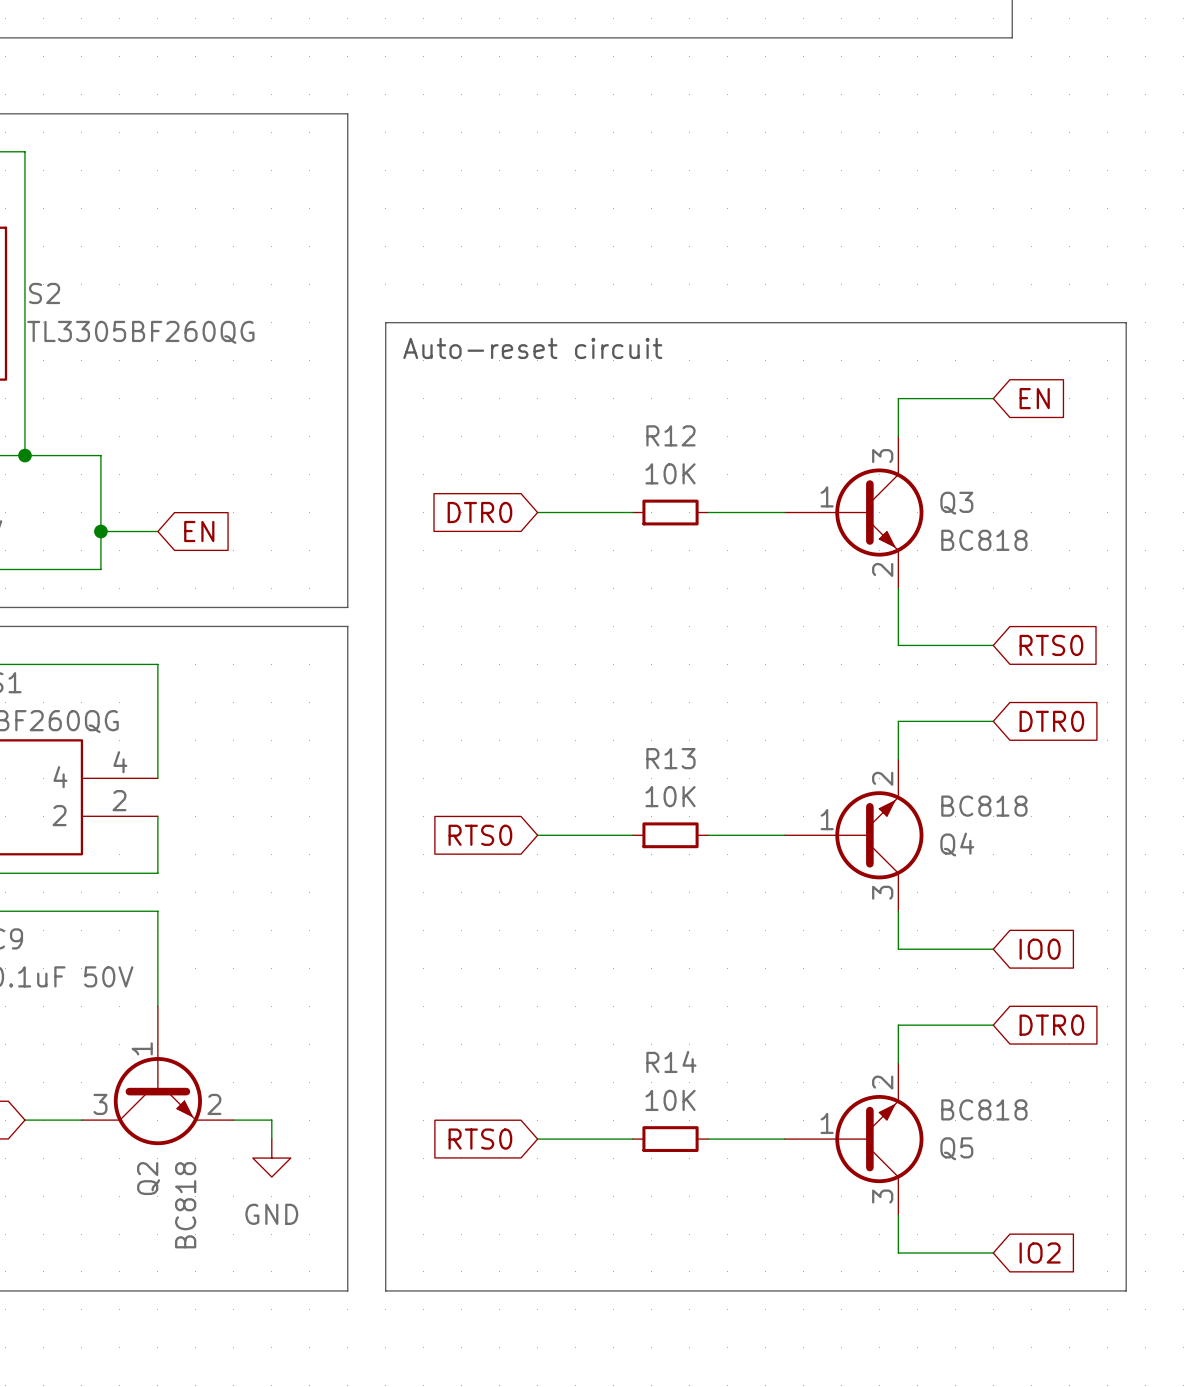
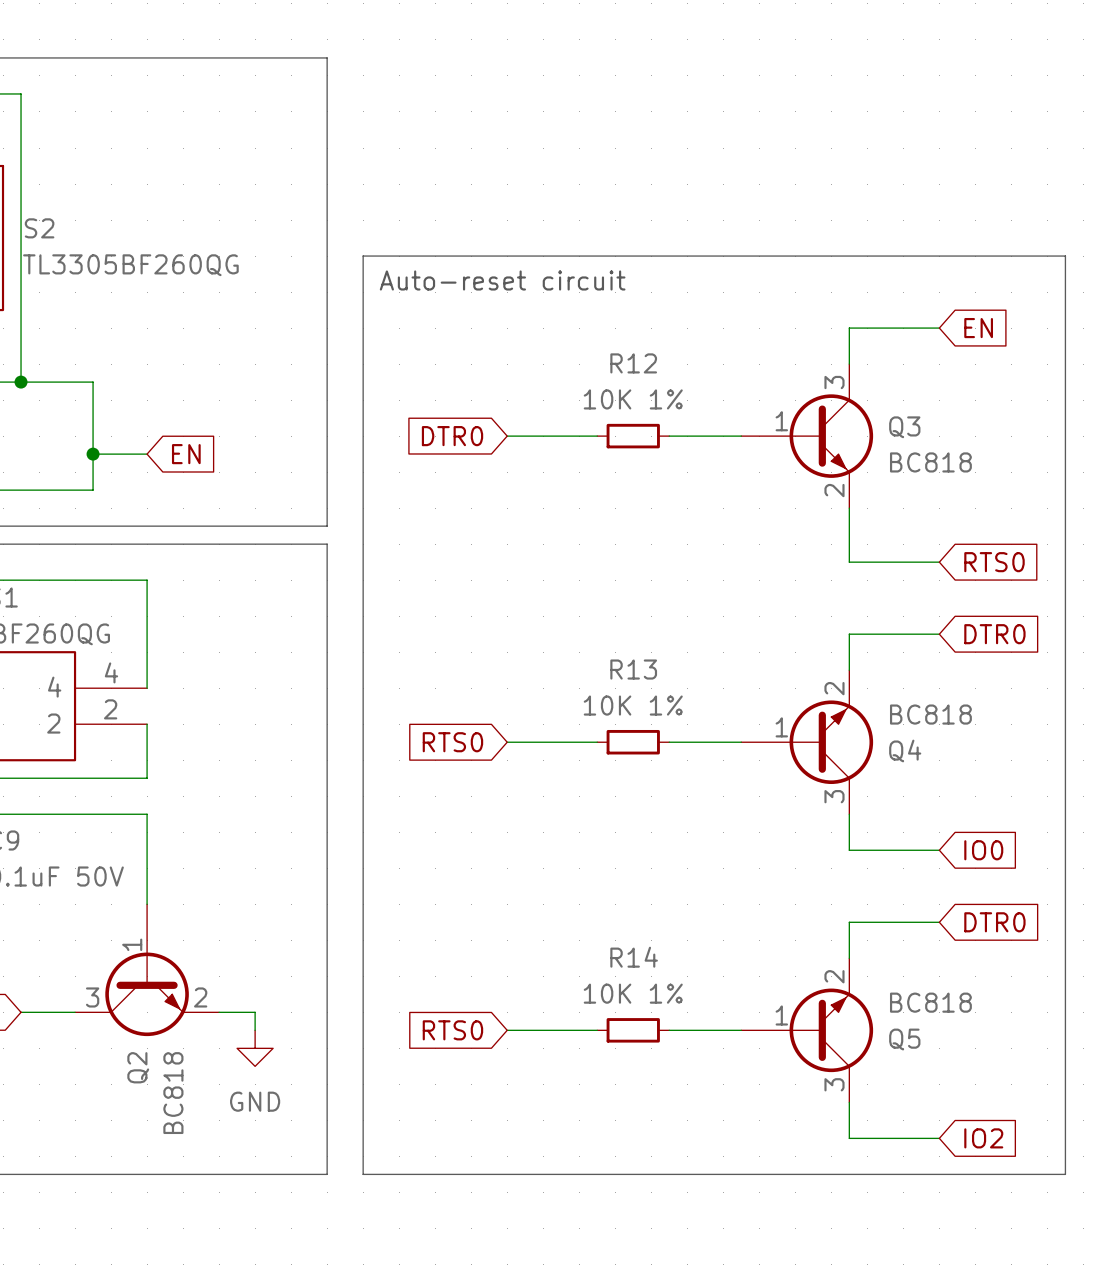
R12 value: 10K (670, 473) -> 10K 1% (633, 399)
R13 value: 10K (670, 796) -> 10K 1% (633, 705)
R14 value: 10K (670, 1100) -> 10K 1% (633, 993)

